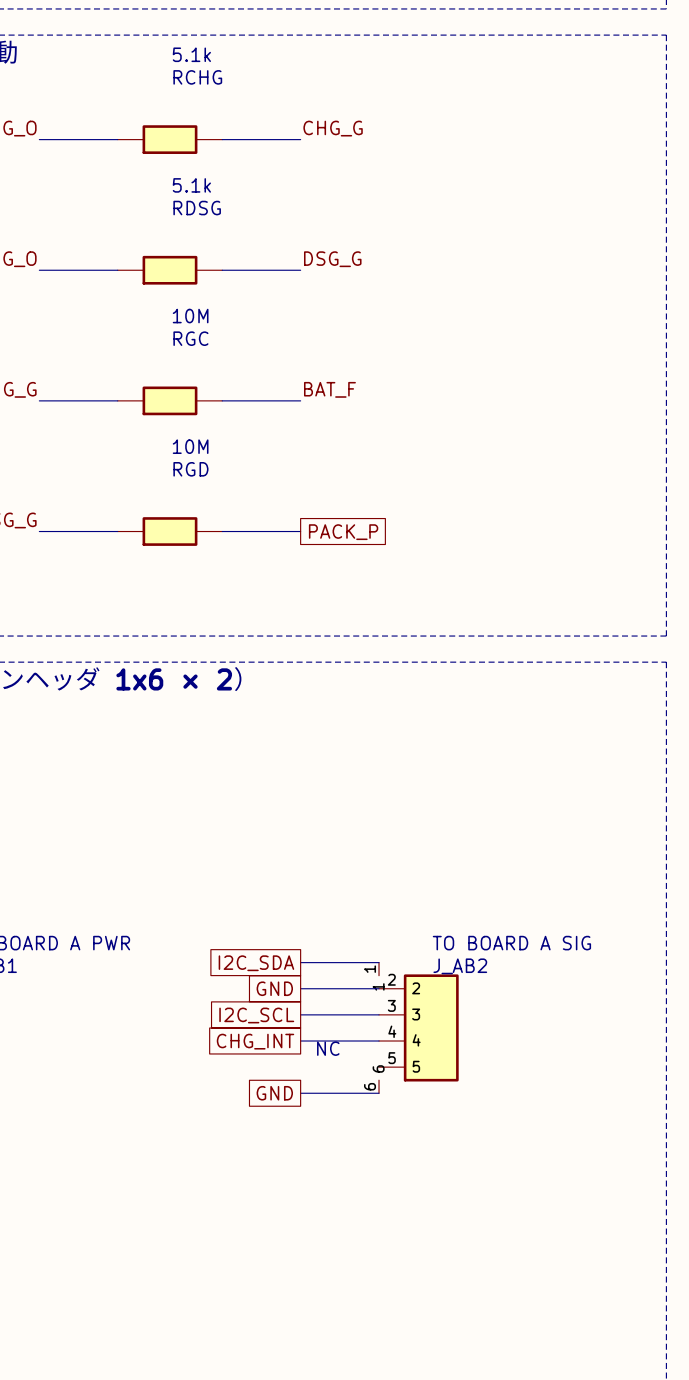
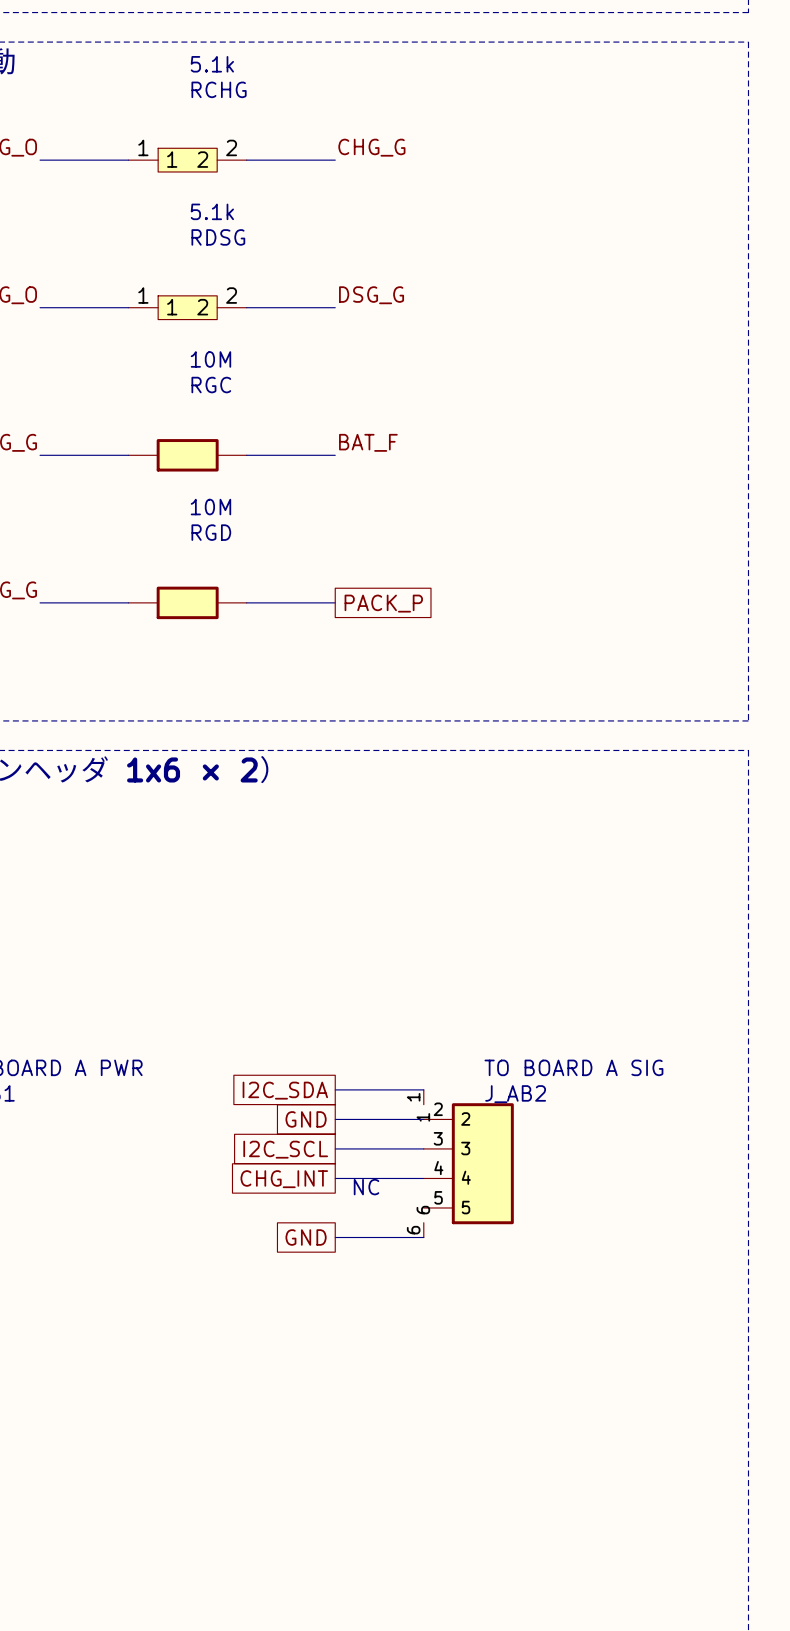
RCHG symbol: [117, 125, 223, 154] -> [128, 148, 247, 172]
RDSG symbol: [117, 255, 223, 285] -> [128, 295, 247, 320]

